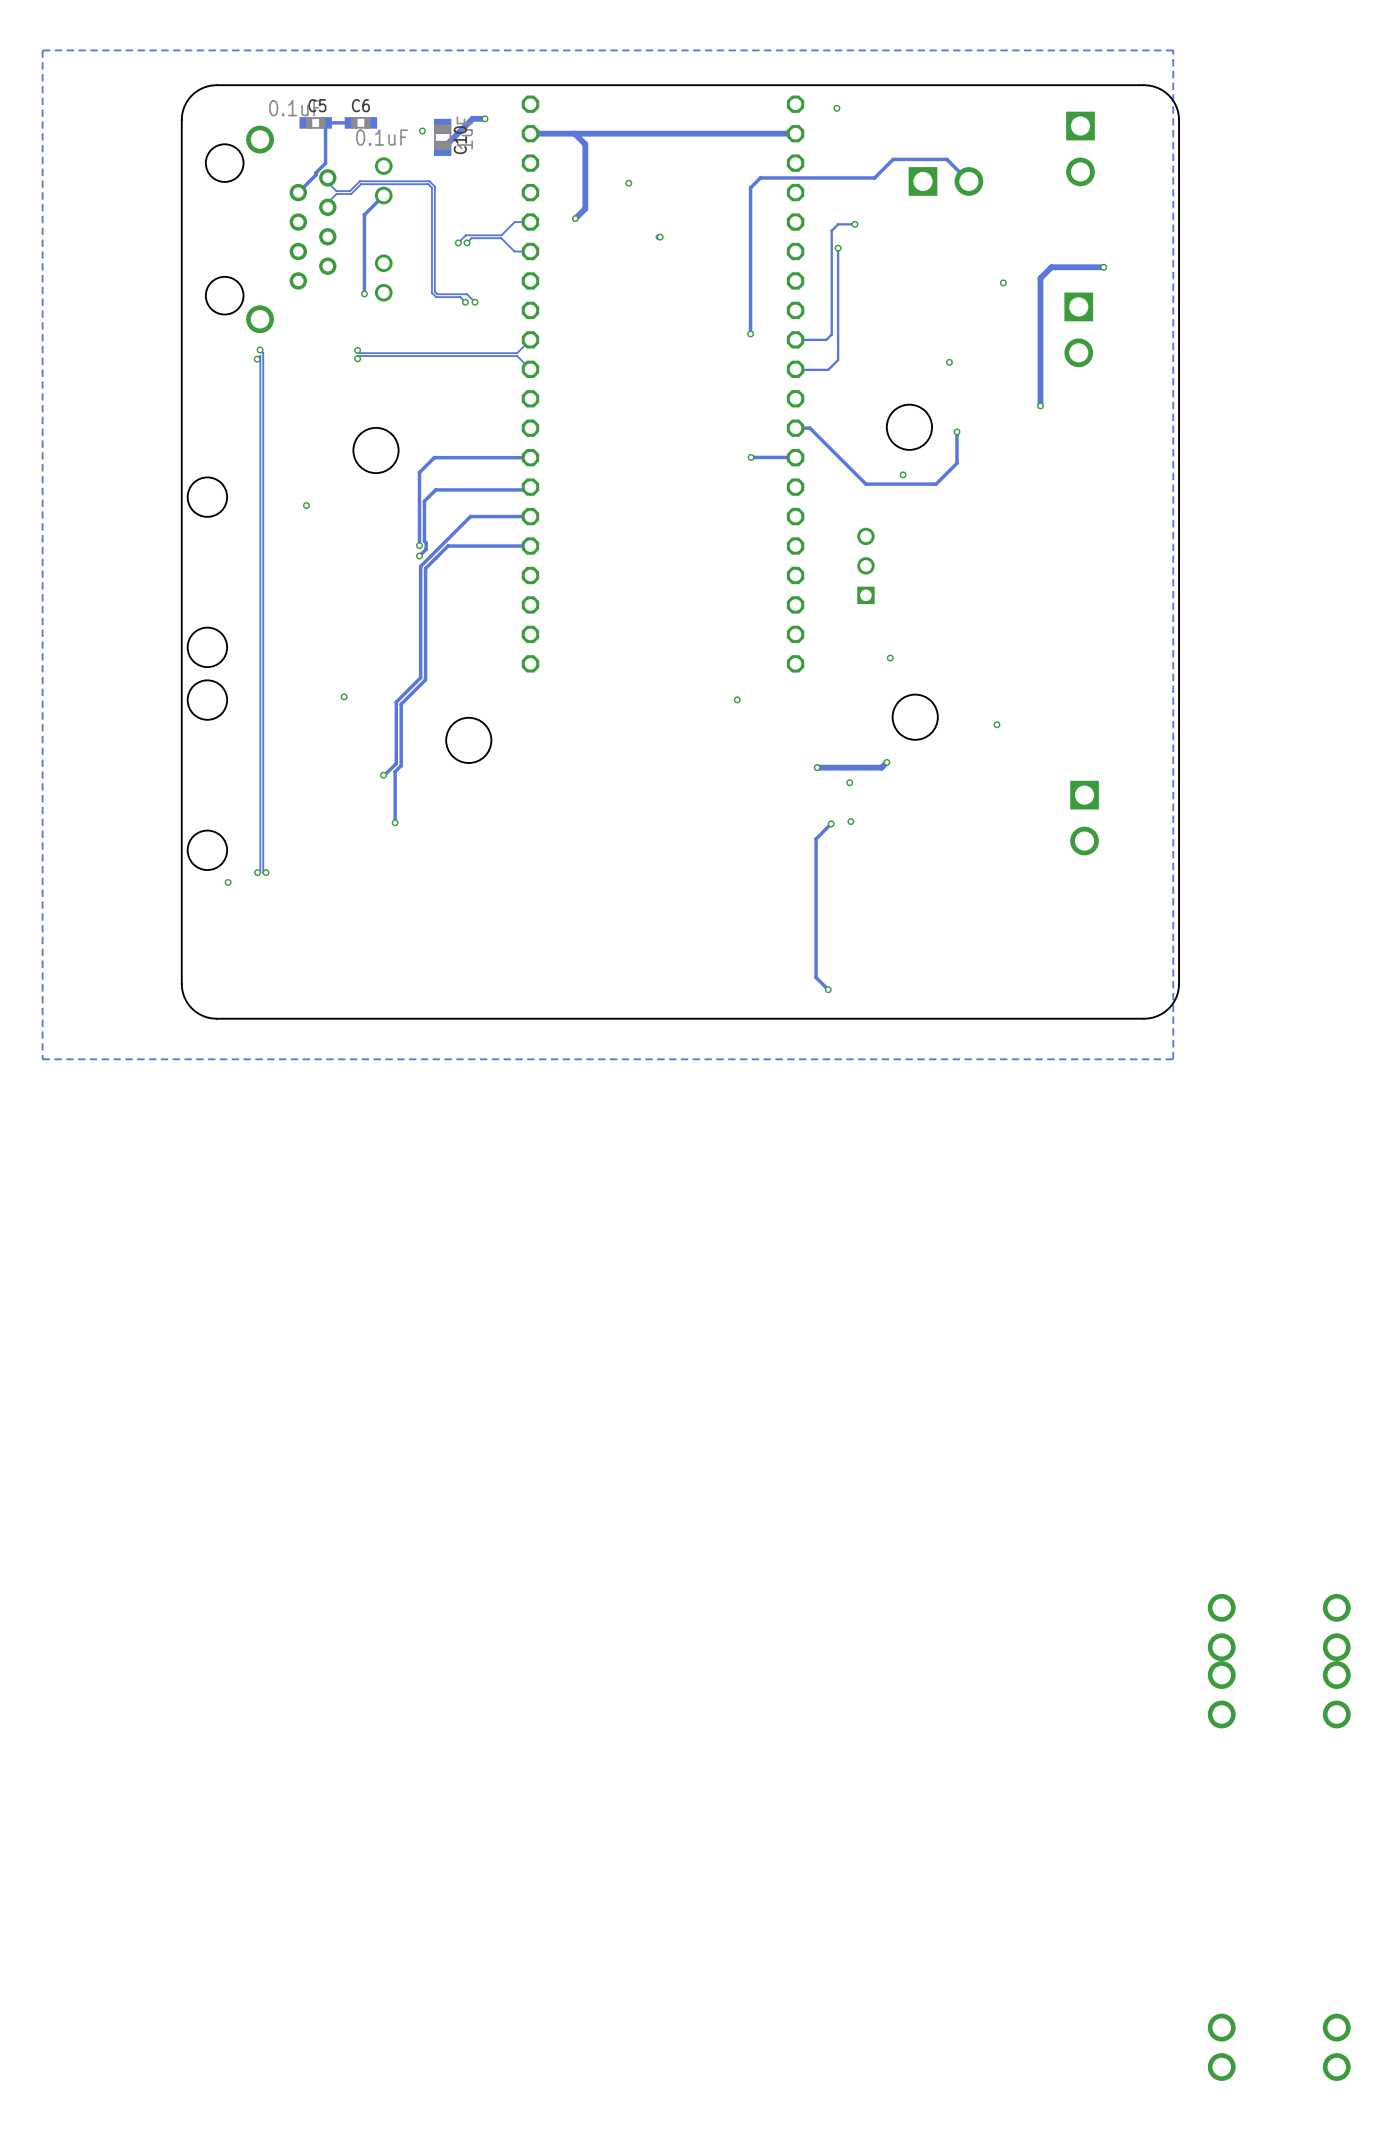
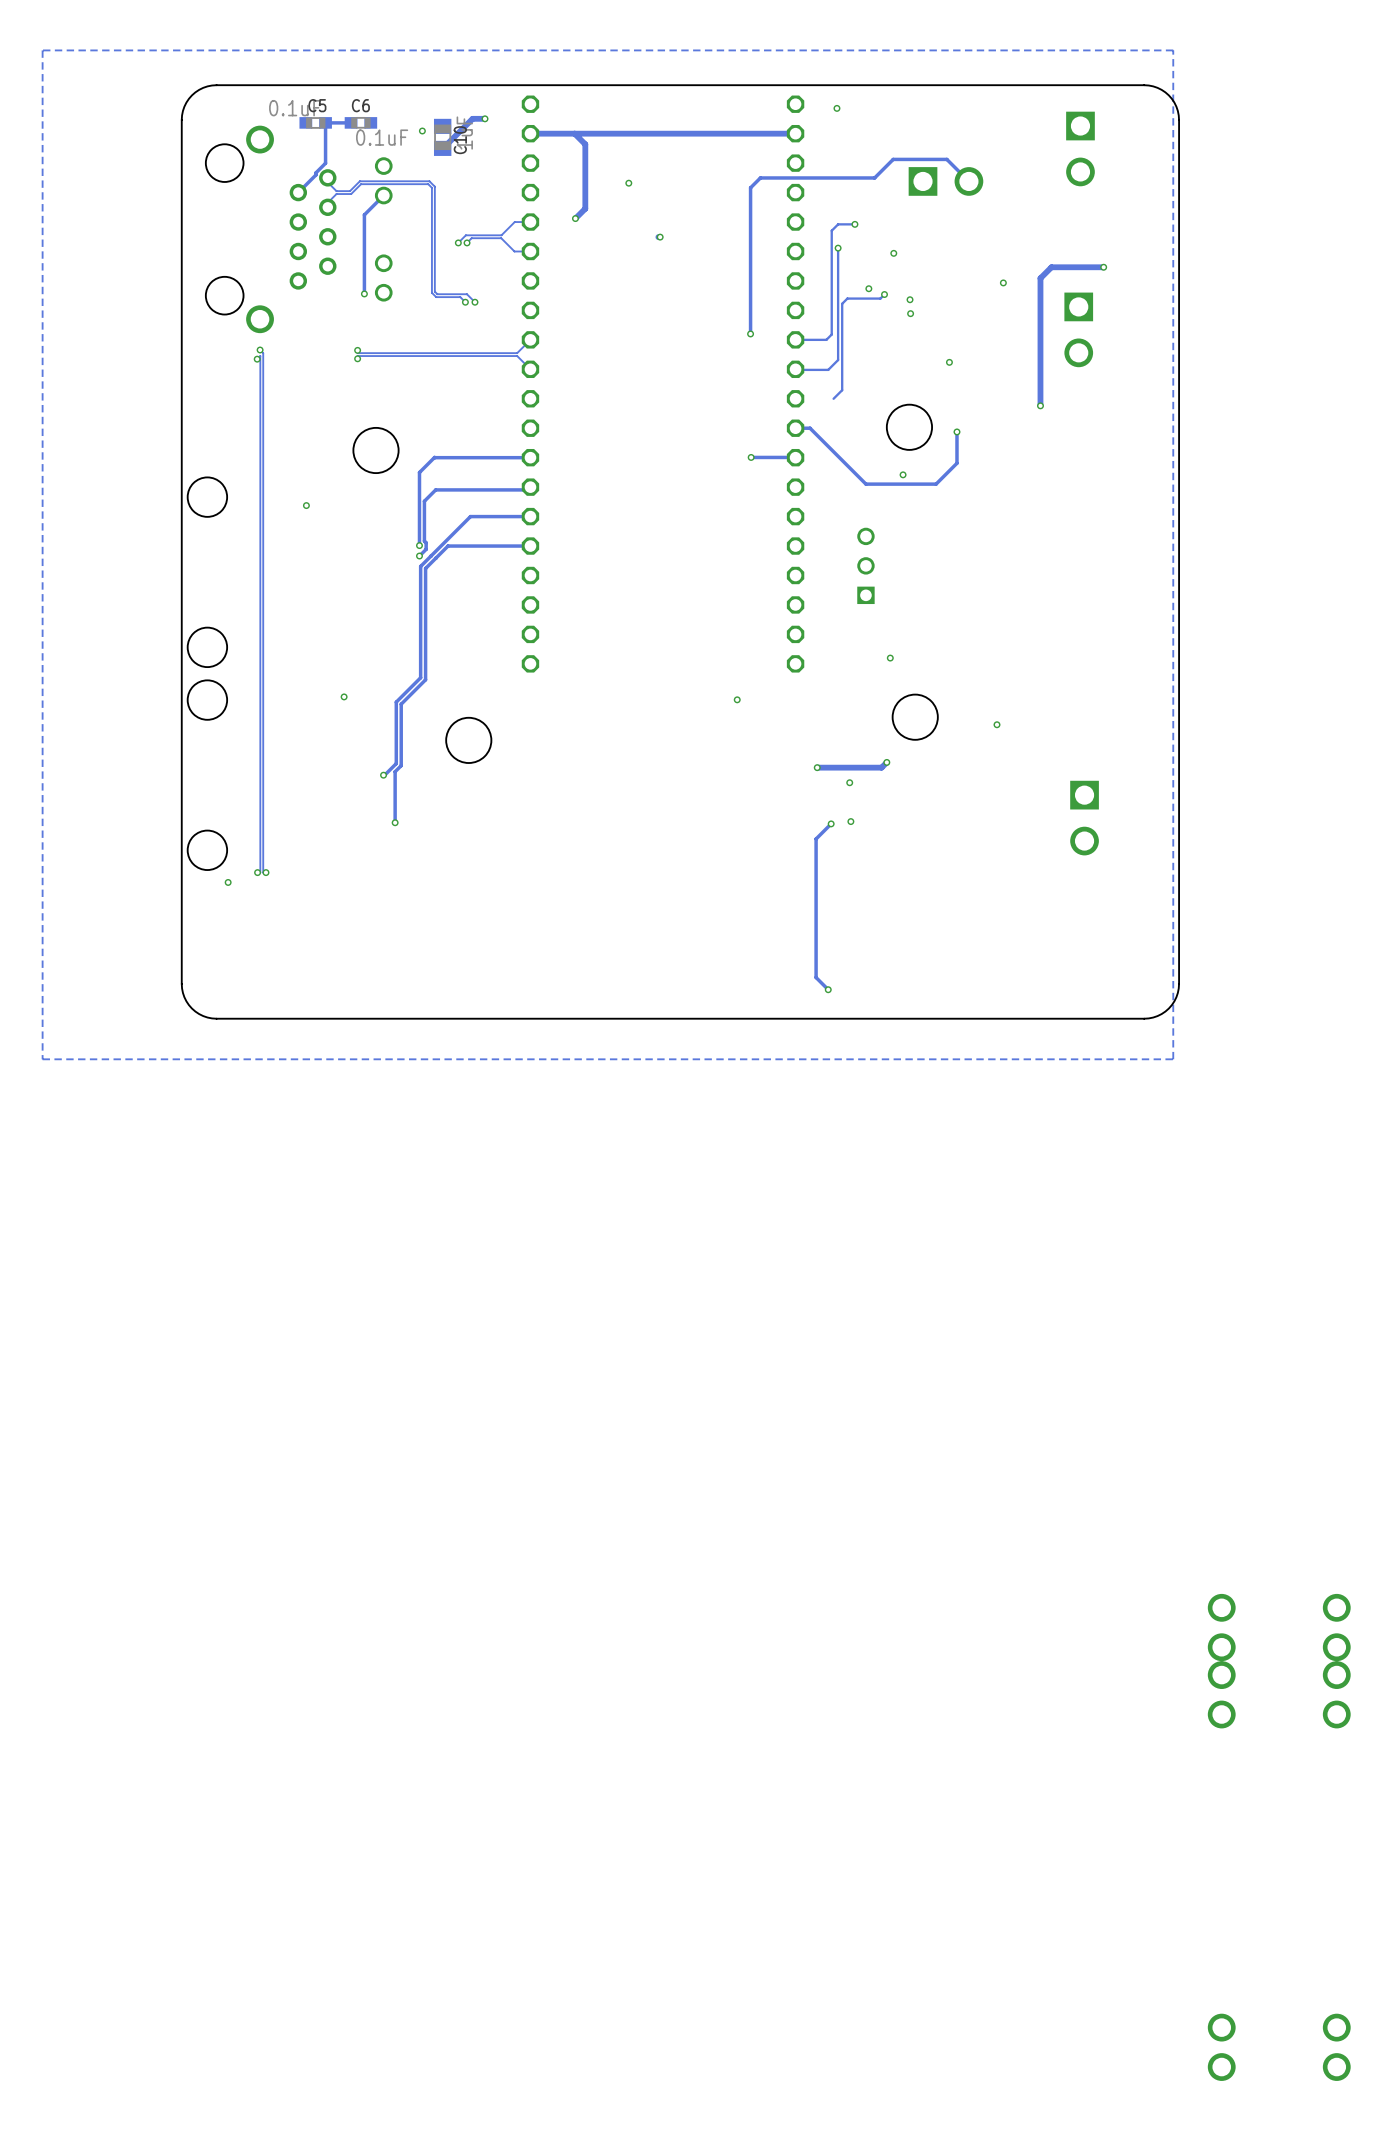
via: none -> (893, 253)
via: none -> (868, 288)
track: none -> (884, 294) (880, 298) (847, 298) (842, 303) (842, 390) (833, 398)
via: none -> (884, 294)
via: none -> (910, 299)
via: none -> (910, 313)

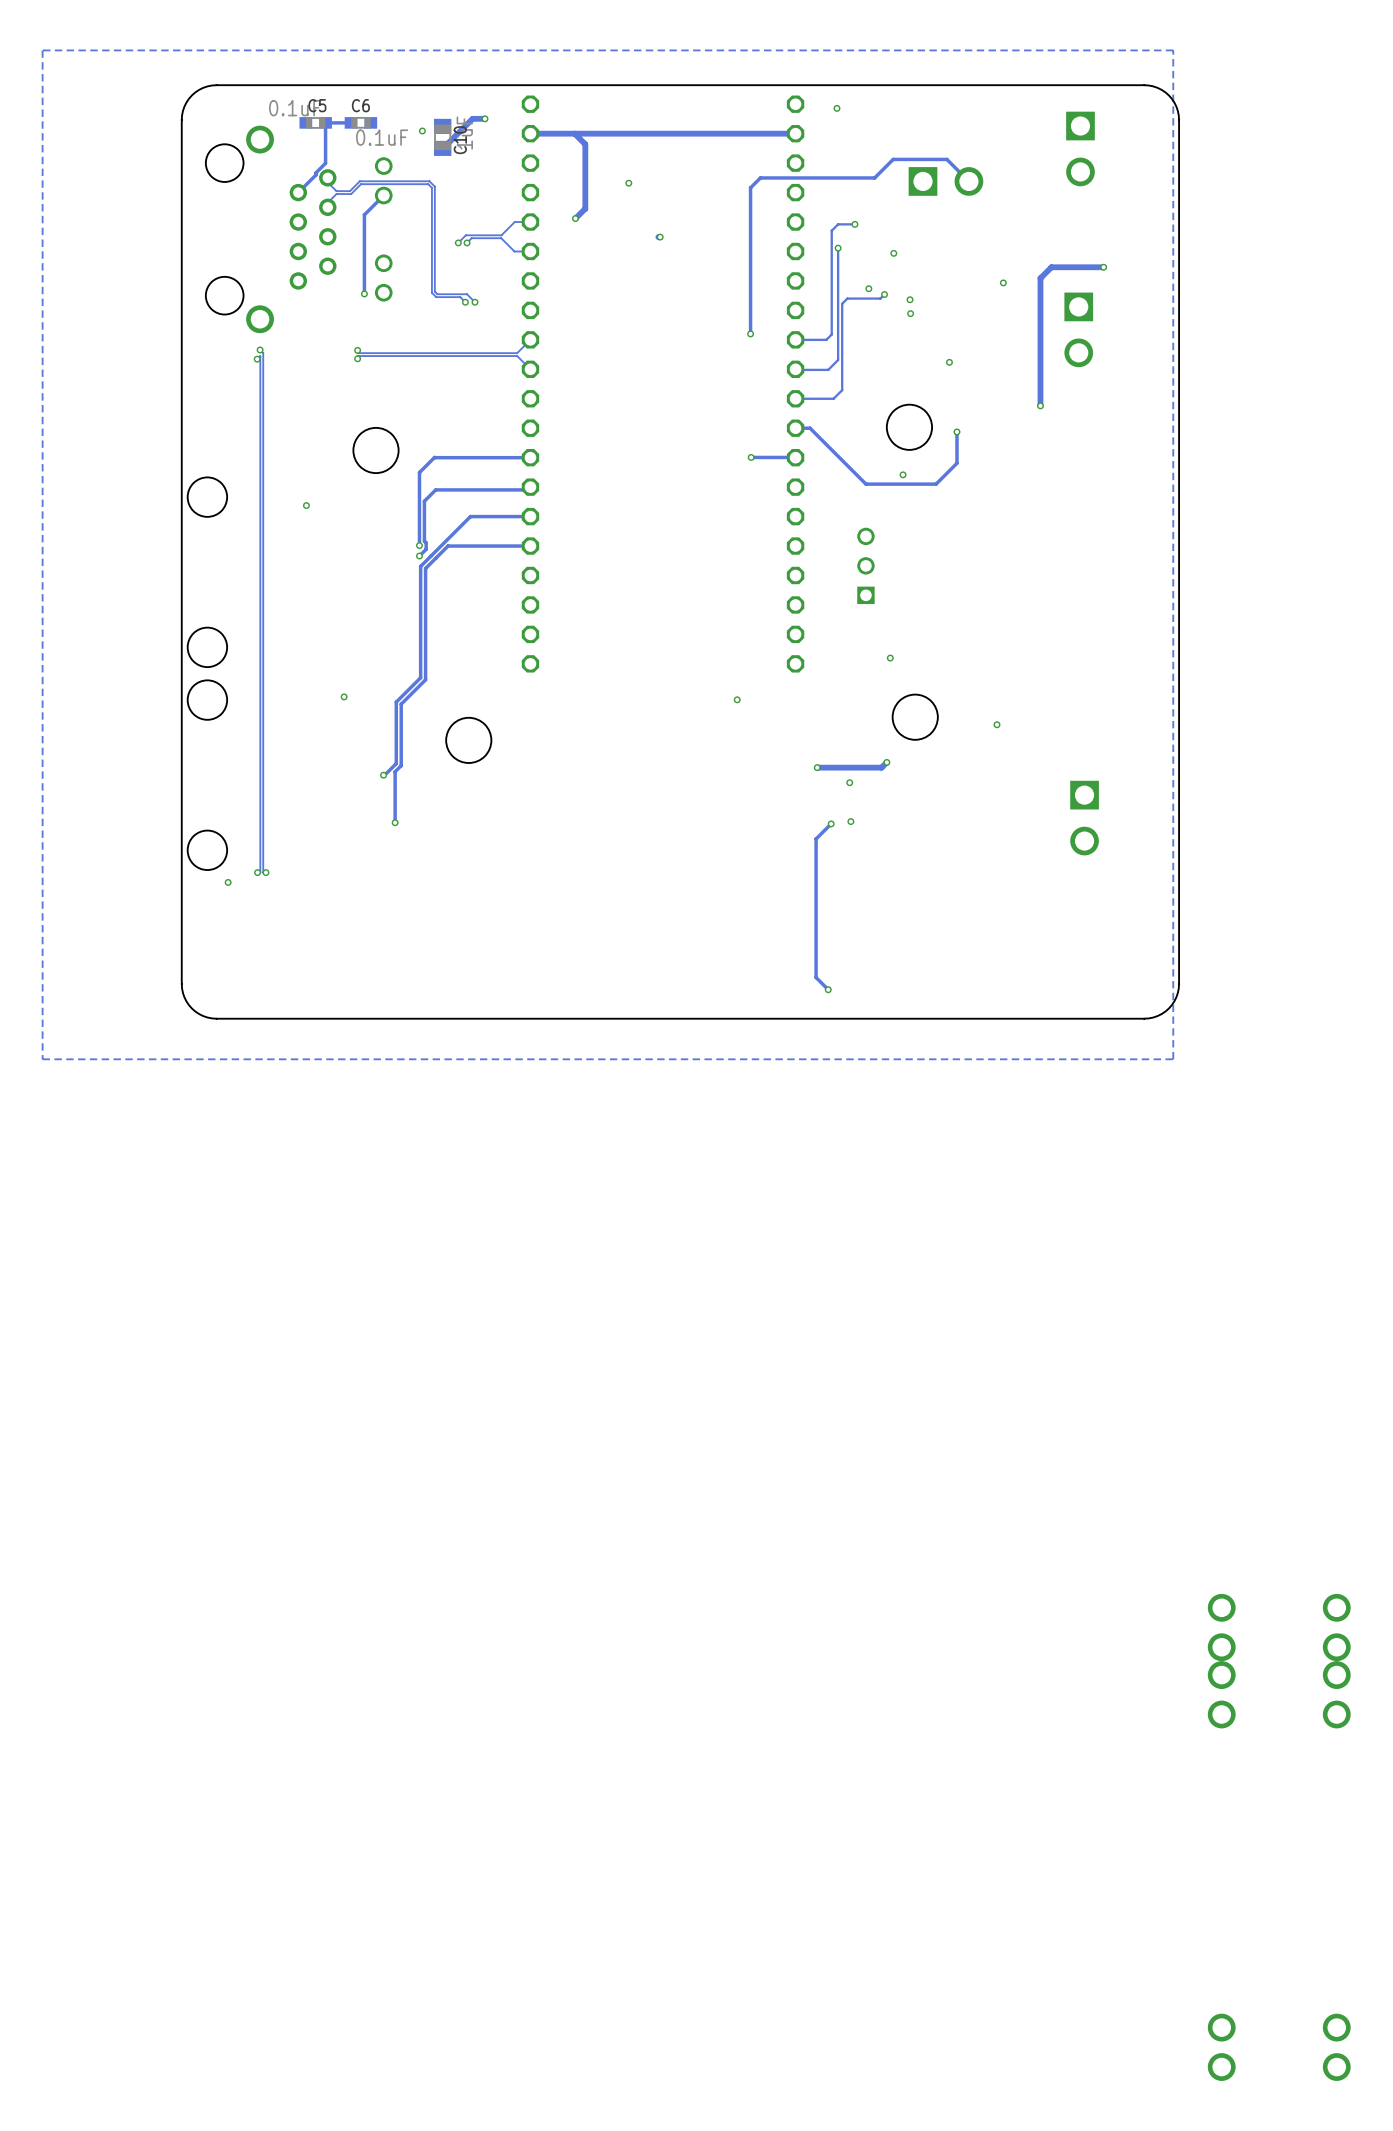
track: none -> (833, 398) (795, 398)

